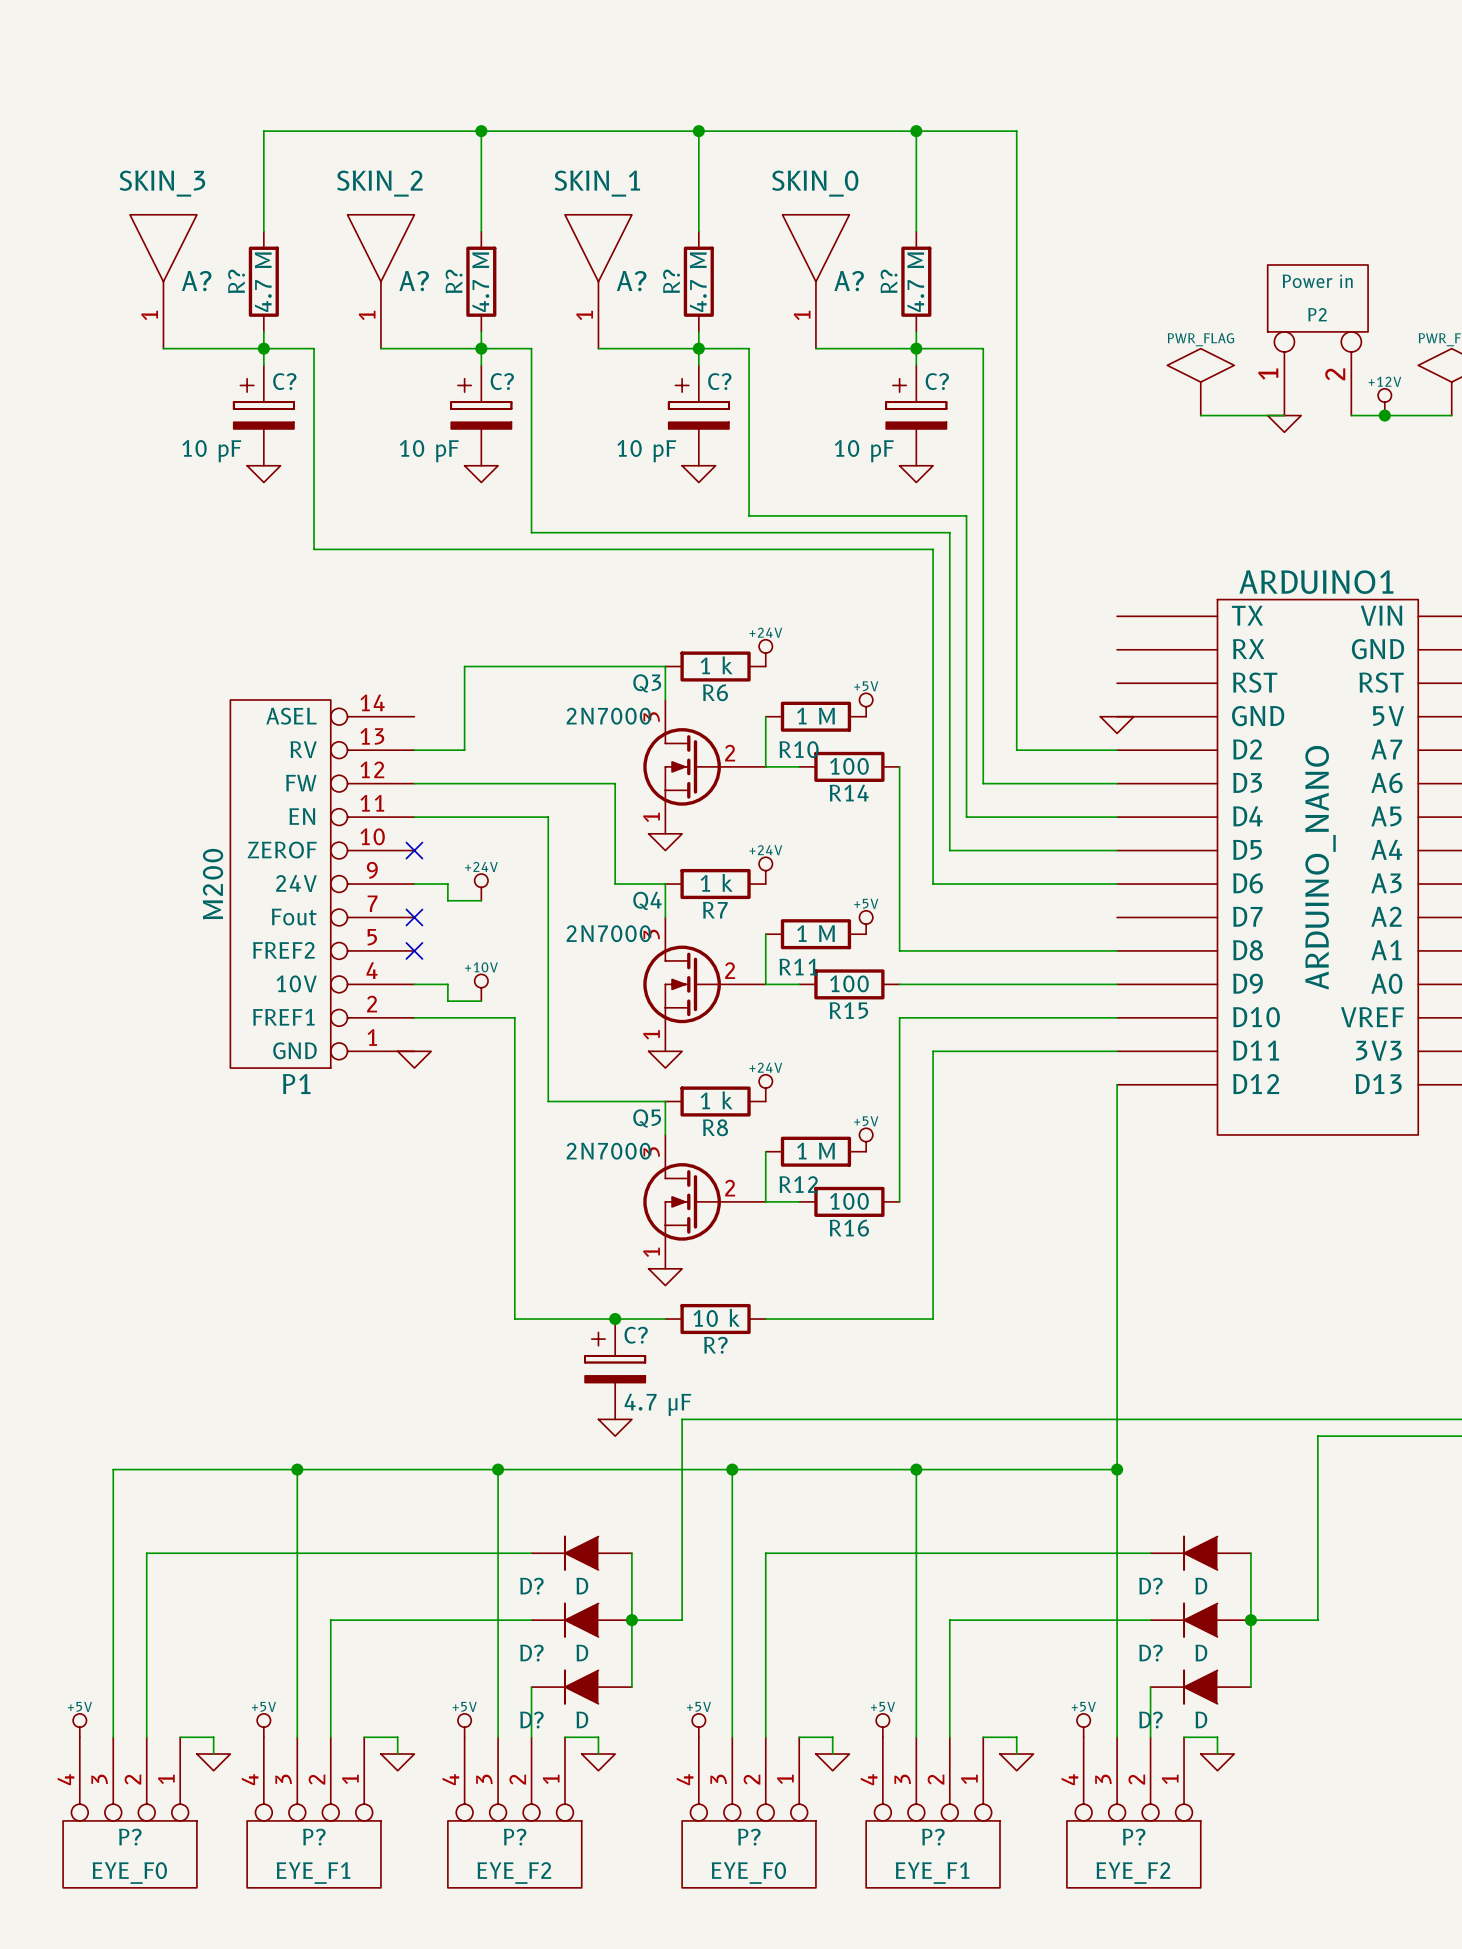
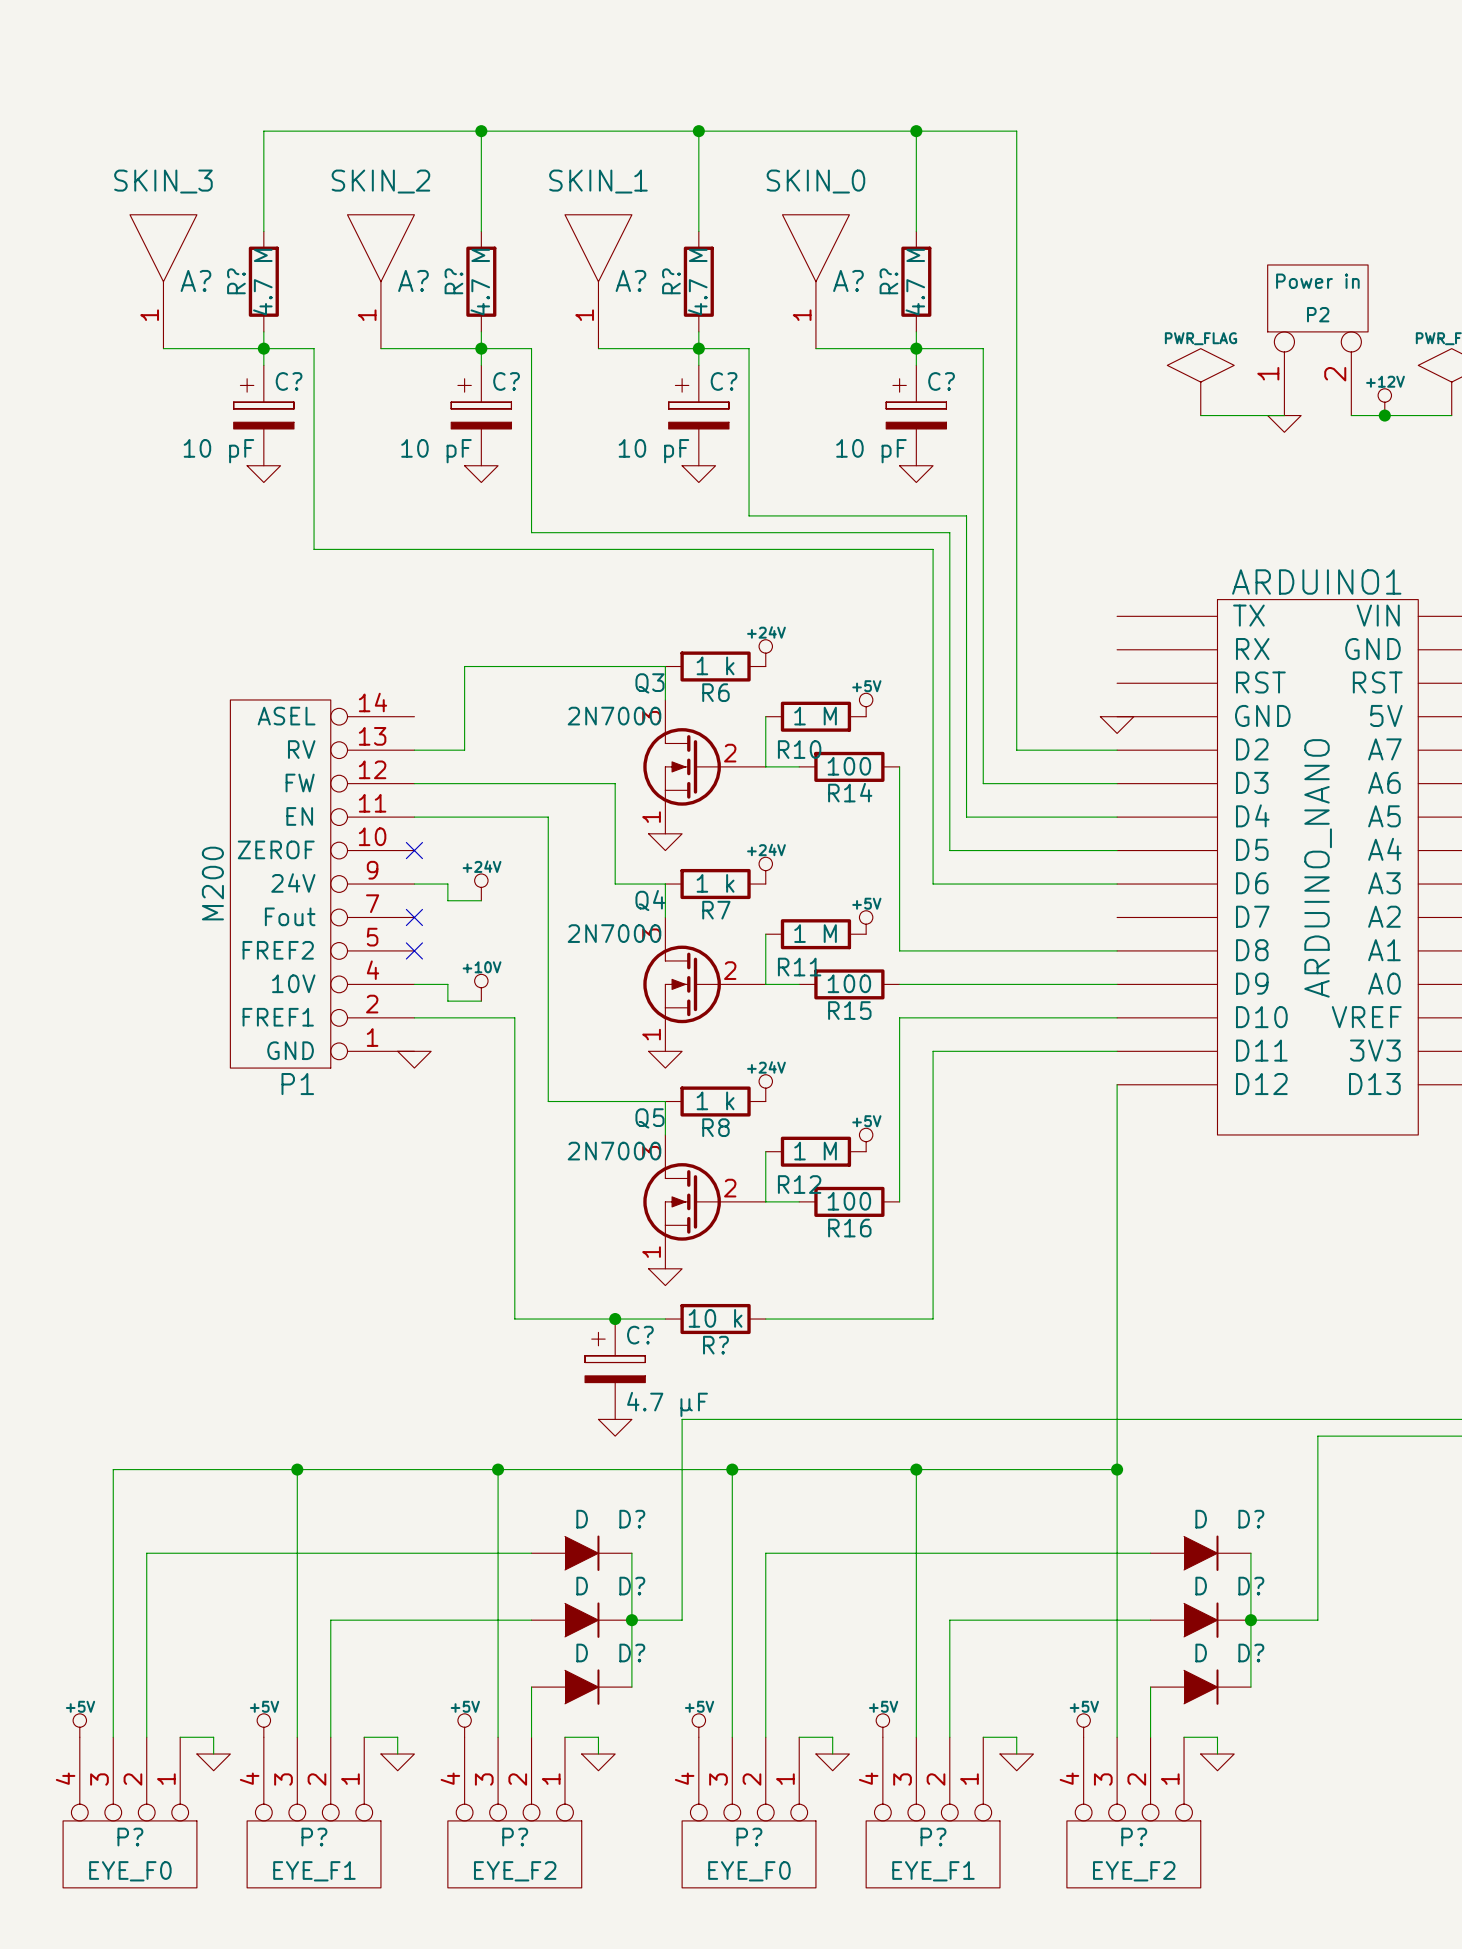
D? rotation: 0° (581, 1553) -> 180° (582, 1553)
D? rotation: 0° (1200, 1553) -> 180° (1201, 1553)
D? rotation: 0° (581, 1620) -> 180° (582, 1620)
D? rotation: 0° (1200, 1620) -> 180° (1201, 1620)
D? rotation: 0° (581, 1687) -> 180° (582, 1687)
D? rotation: 0° (1200, 1687) -> 180° (1201, 1687)

